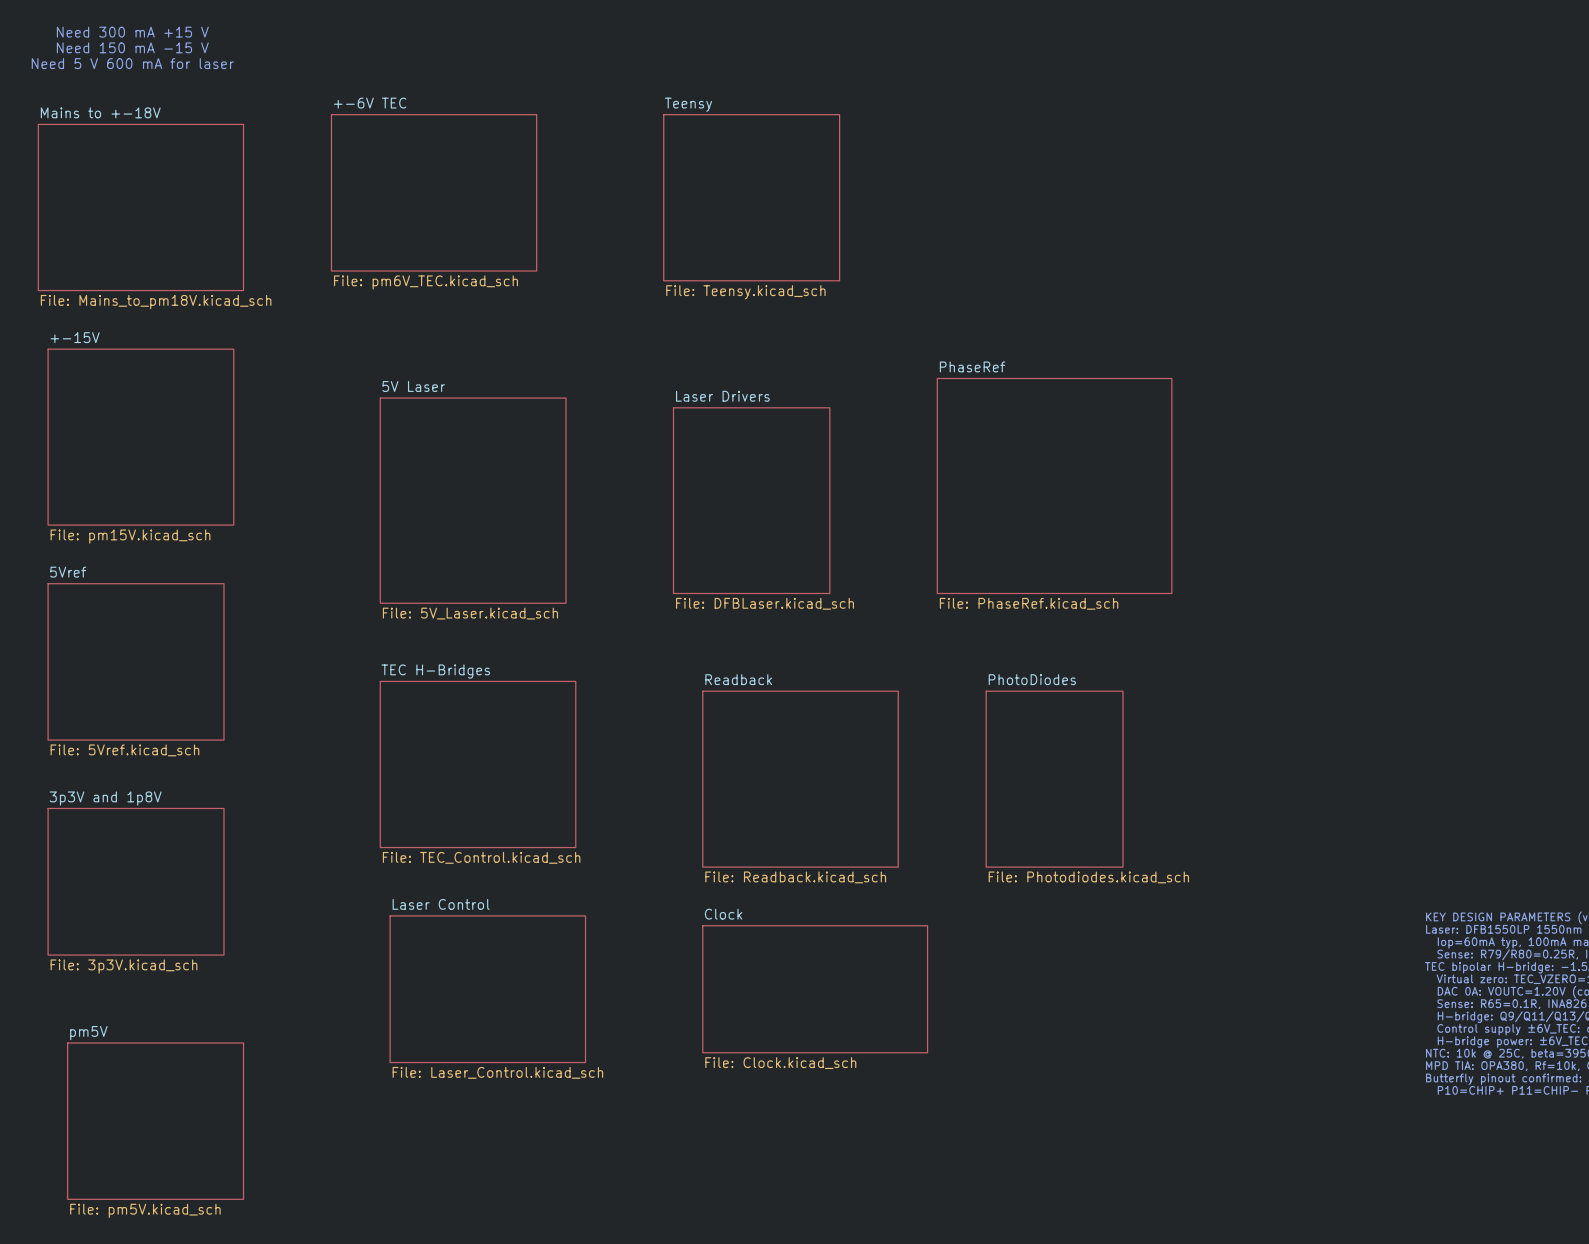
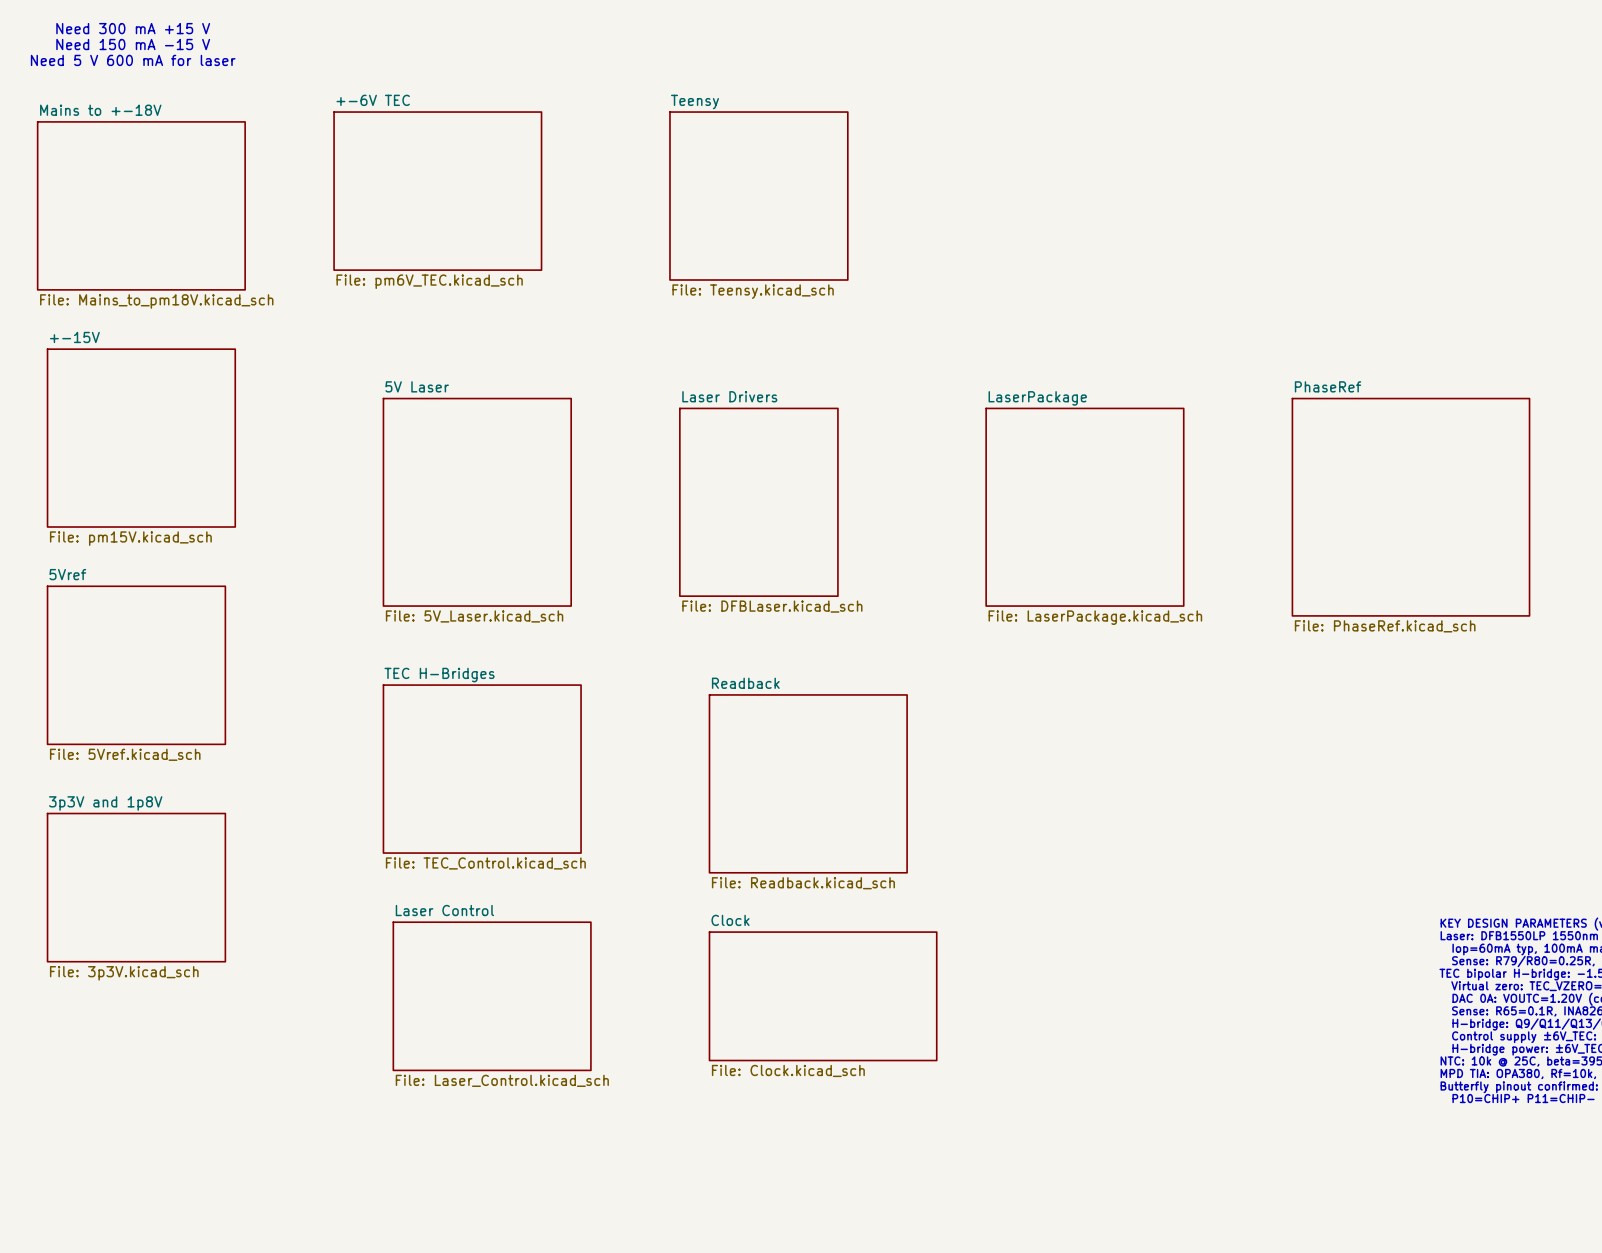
sheet PhaseRef: File: PhaseRef.kicad_sch (1054, 485) -> none
sheet LaserPackage: none -> File: LaserPackage.kicad_sch (1084, 507)
sheet PhaseRef: none -> File: PhaseRef.kicad_sch (1410, 507)
sheet PhotoDiodes: File: Photodiodes.kicad_sch (1054, 779) -> none
sheet pm5V: File: pm5V.kicad_sch (155, 1121) -> none

